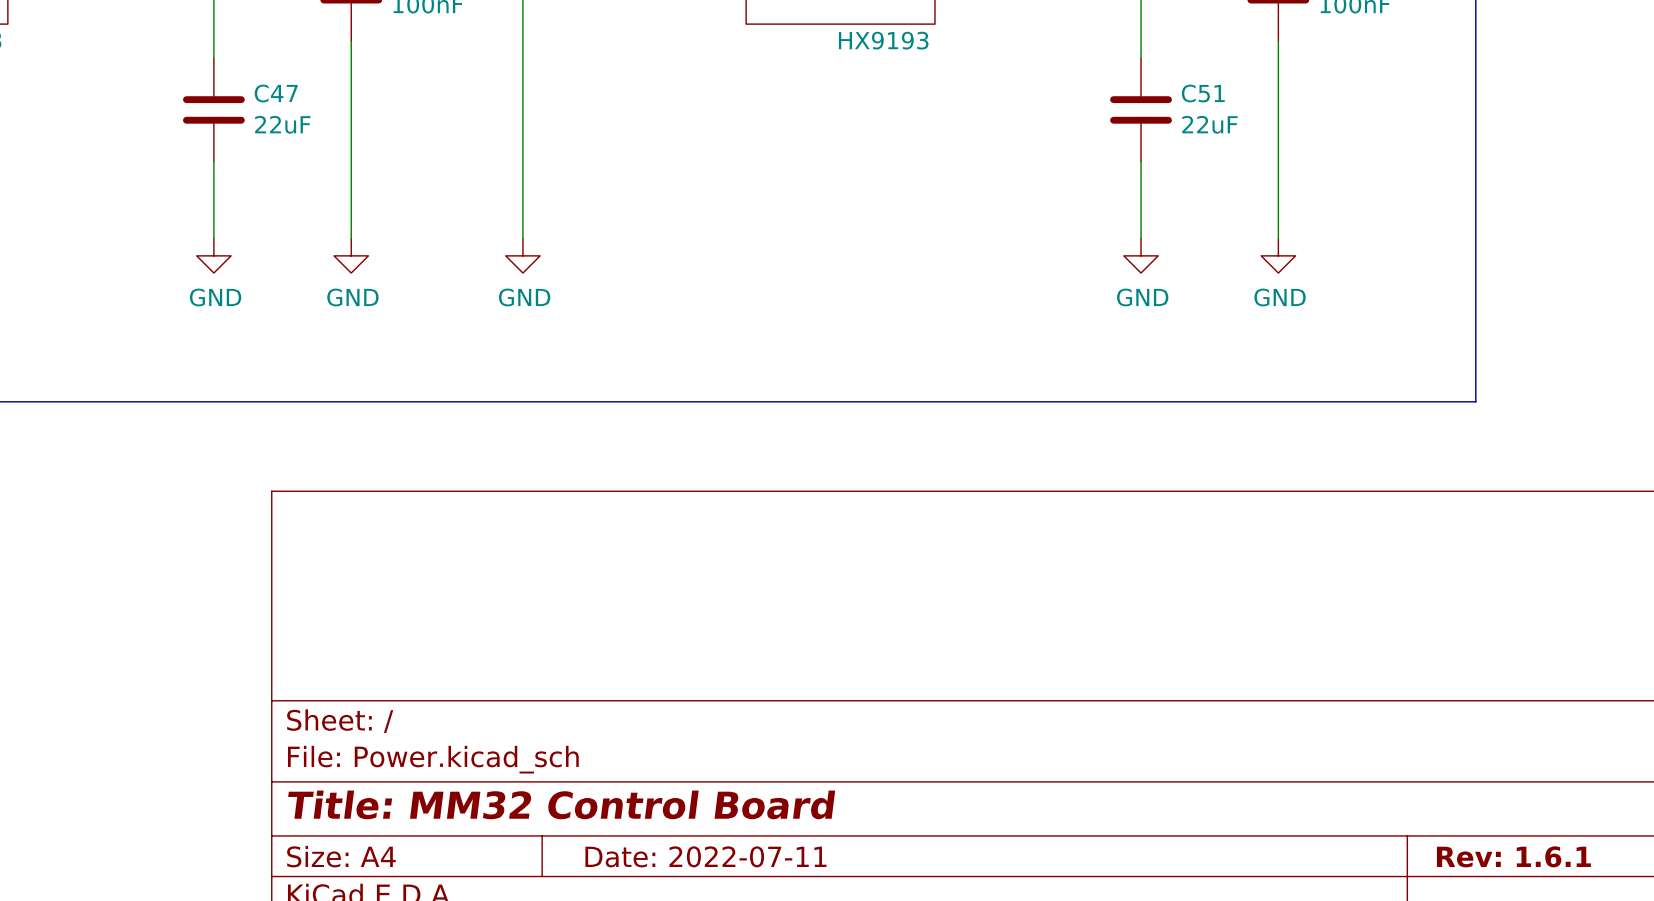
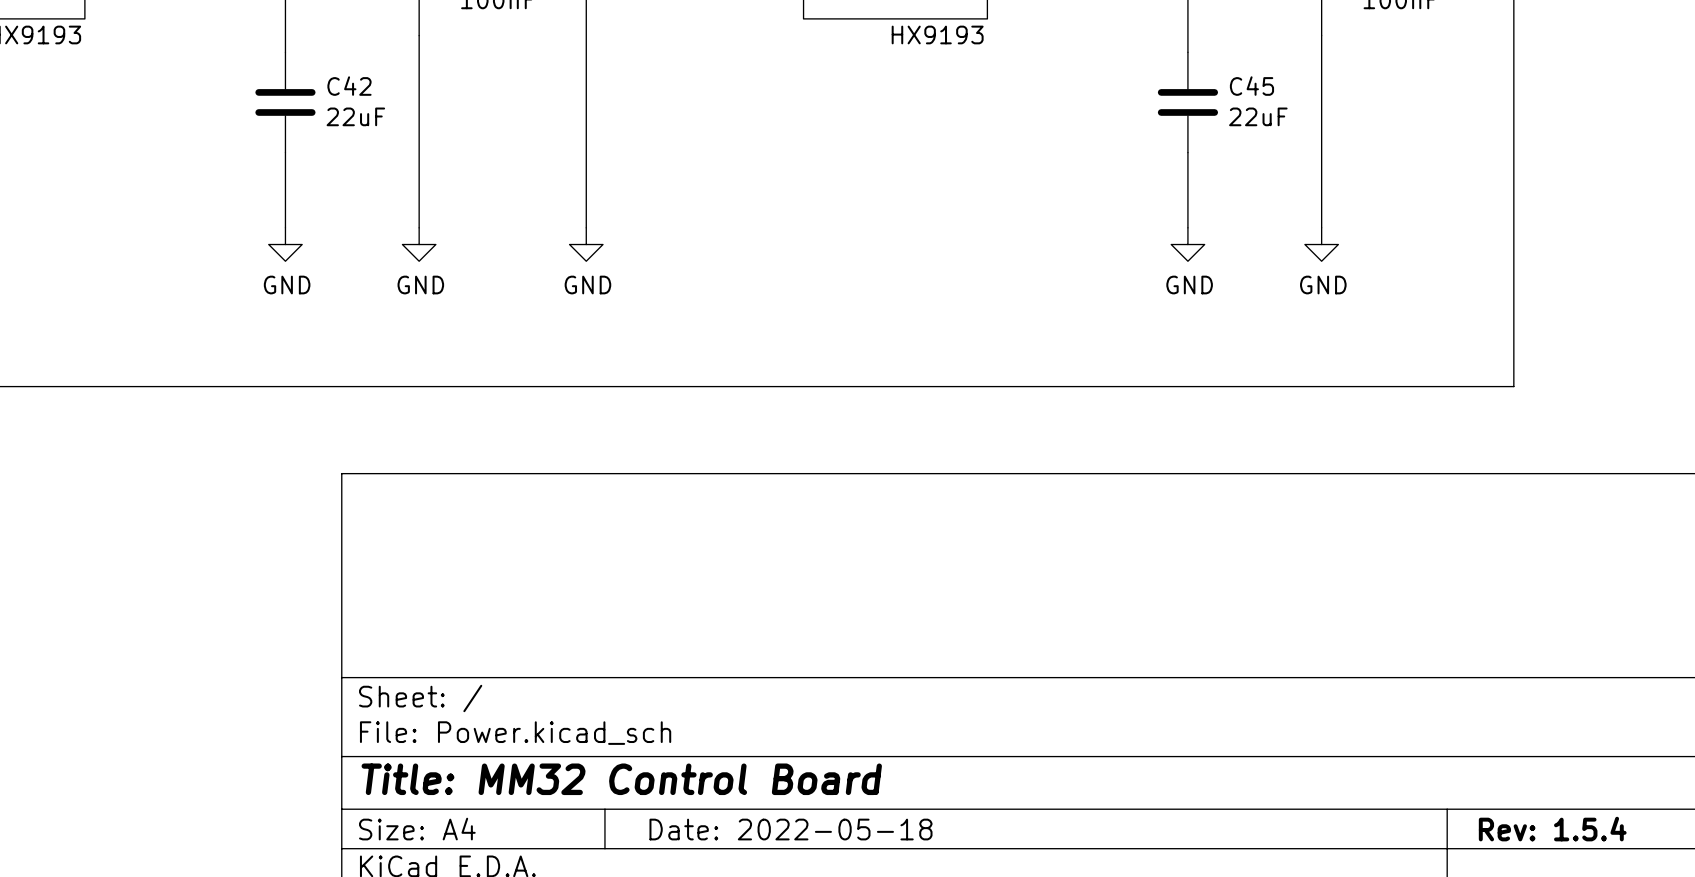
C47 name: C47 (276, 93) -> C42 (349, 86)
C51 name: C51 (1203, 93) -> C45 (1251, 86)
title block: Date: 2022-07-11 (705, 856) -> Date: 2022-05-18 (790, 829)
title block: Rev: 1.6.1 (1513, 856) -> Rev: 1.5.4 (1552, 829)

